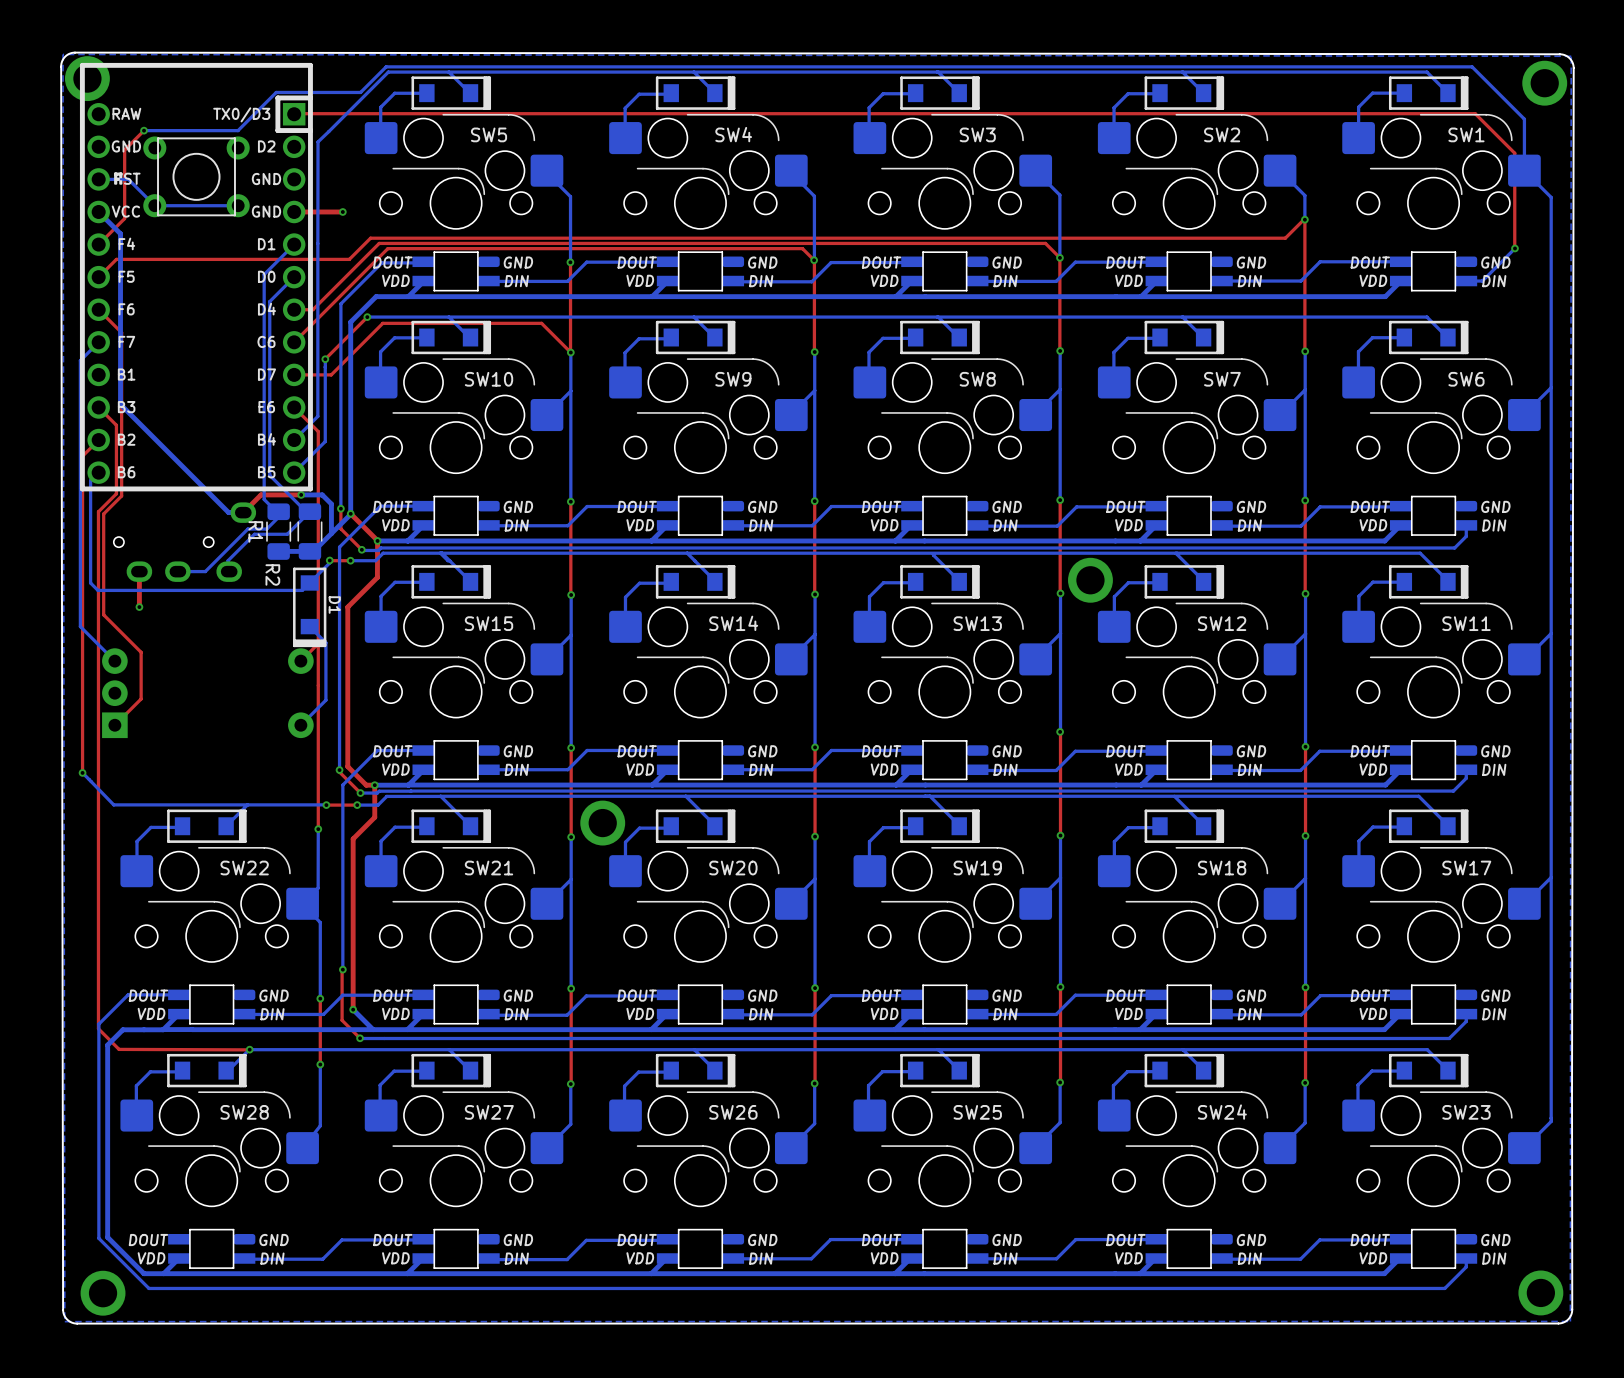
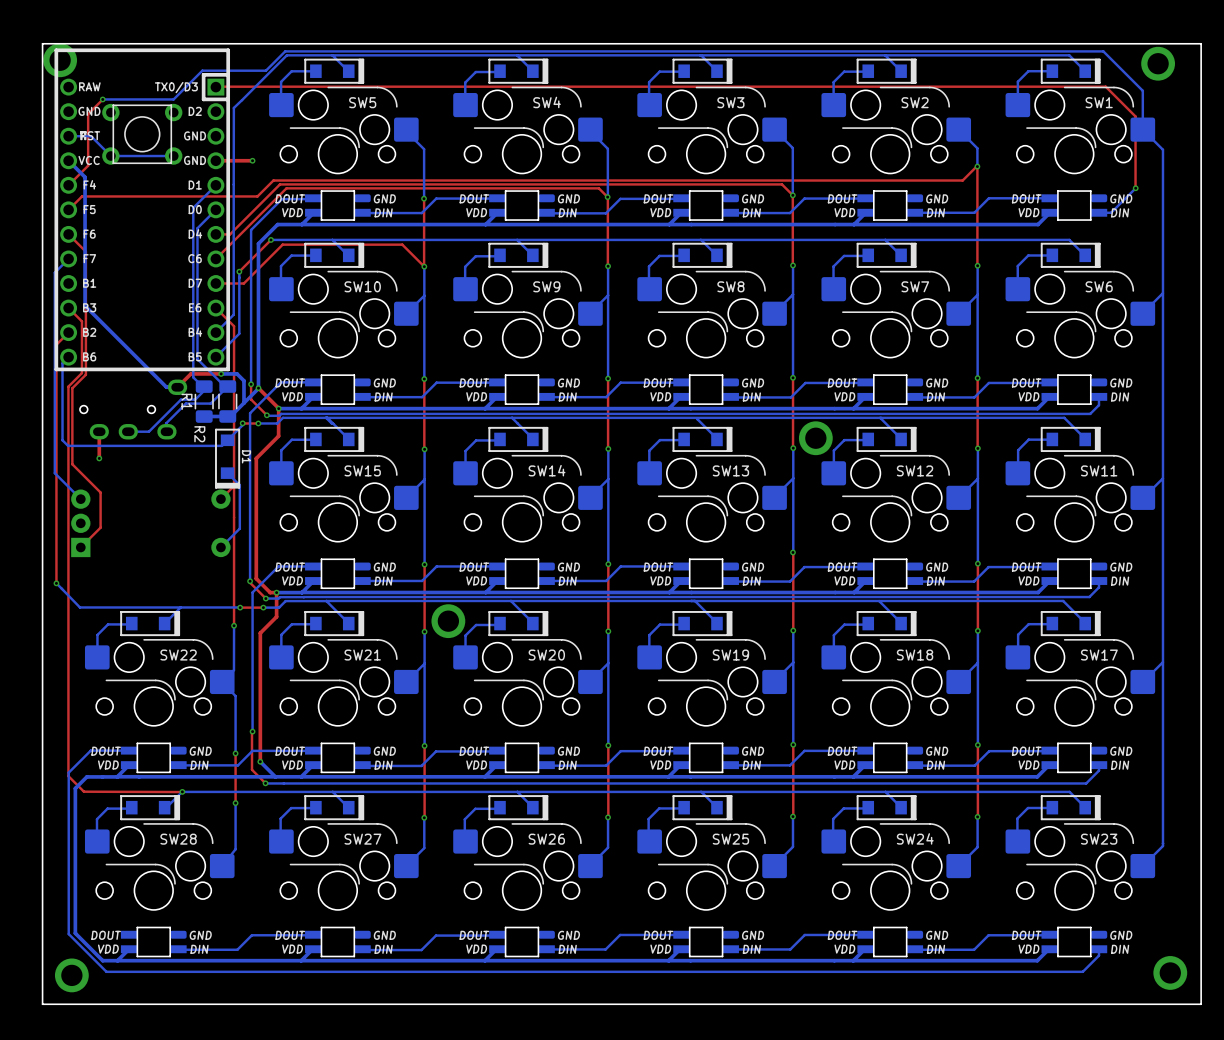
board edge: (74, 52) (1559, 54) (1568, 57) (1573, 68) (1572, 1309) (1569, 1318) (1558, 1323) (77, 1323) (68, 1320) (63, 1309) (61, 66) (65, 56) (74, 52) -> (1201, 43) (1201, 1004) (42, 1004) (42, 43) (1201, 43)
bottom zone outline: (1571, 56) (63, 54) (64, 1321) (1570, 1321) (1571, 56) -> none
part position: (1540, 1292) -> (1170, 972)

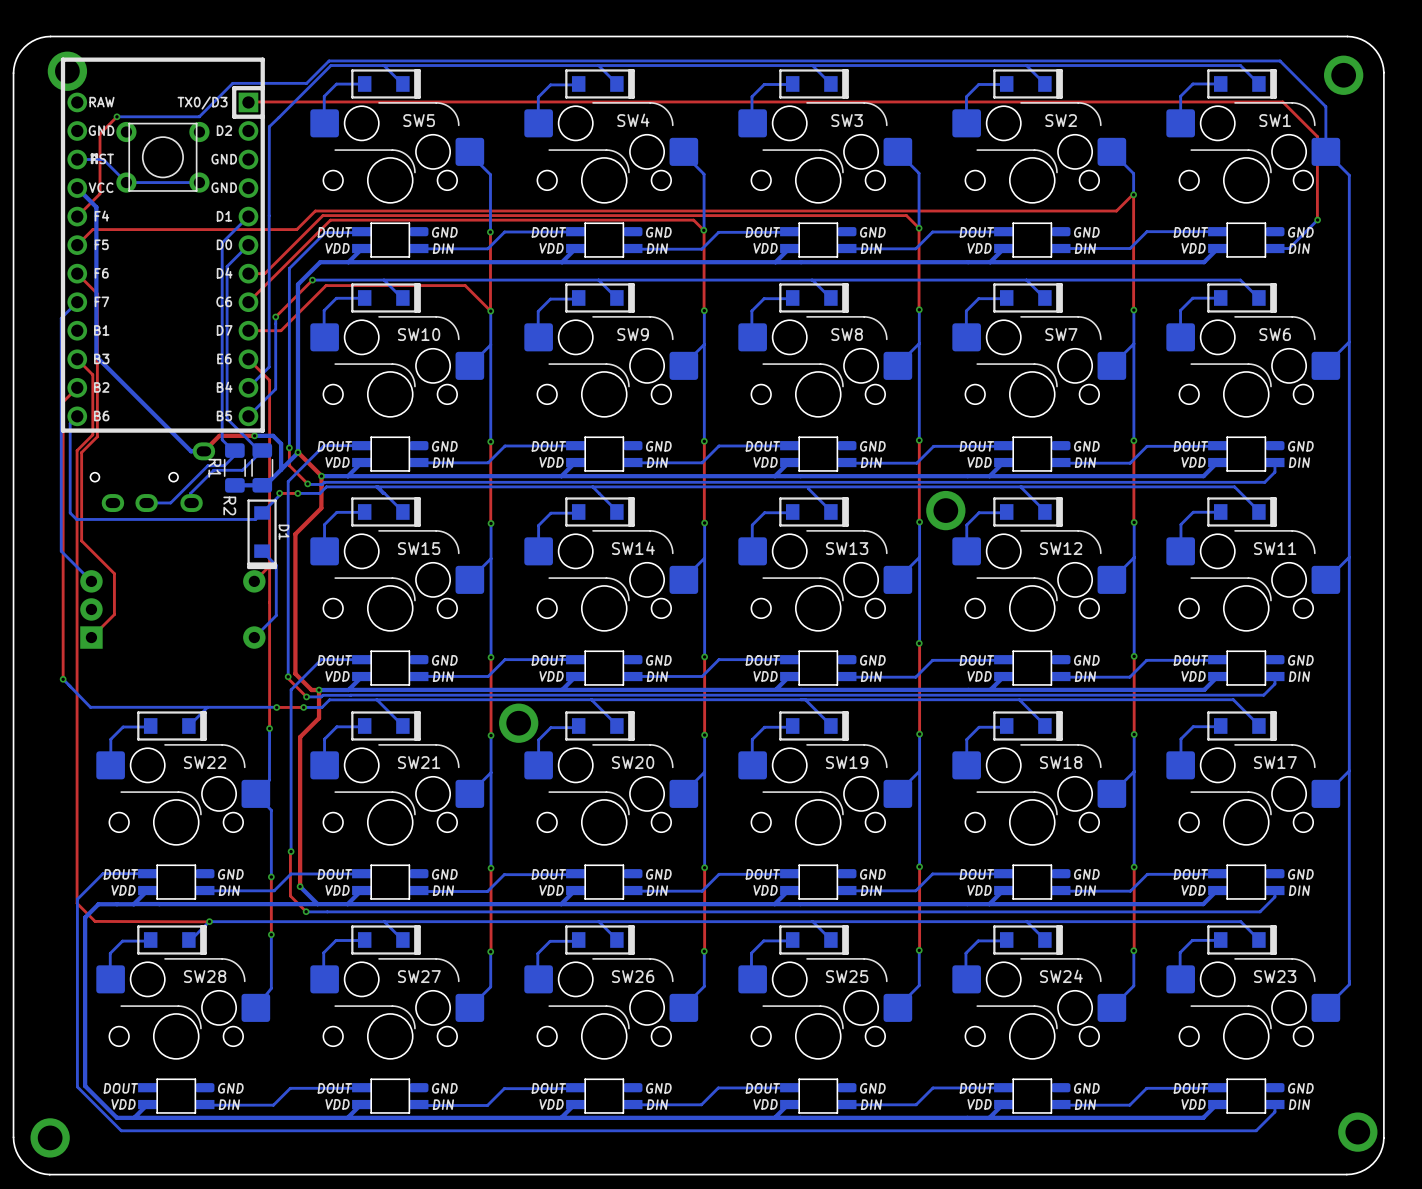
board edge: (1201, 43) (42, 43) (42, 1004) (1201, 1004) (1201, 43) -> (1347, 36) (1361, 39) (1372, 47) (1380, 58) (1383, 72) (1383, 1137) (1378, 1156) (1369, 1166) (1360, 1171) (1346, 1174) (49, 1174) (35, 1171) (20, 1159) (14, 1146) (13, 1137) (13, 73) (16, 59) (28, 44) (41, 37) (50, 36) (1347, 36)
top track: (252, 160) (215, 160) -> none
via: (252, 160) -> none
top track: (99, 431) (99, 458) -> none
via: (99, 458) -> none
part position: (71, 975) -> (50, 1137)

